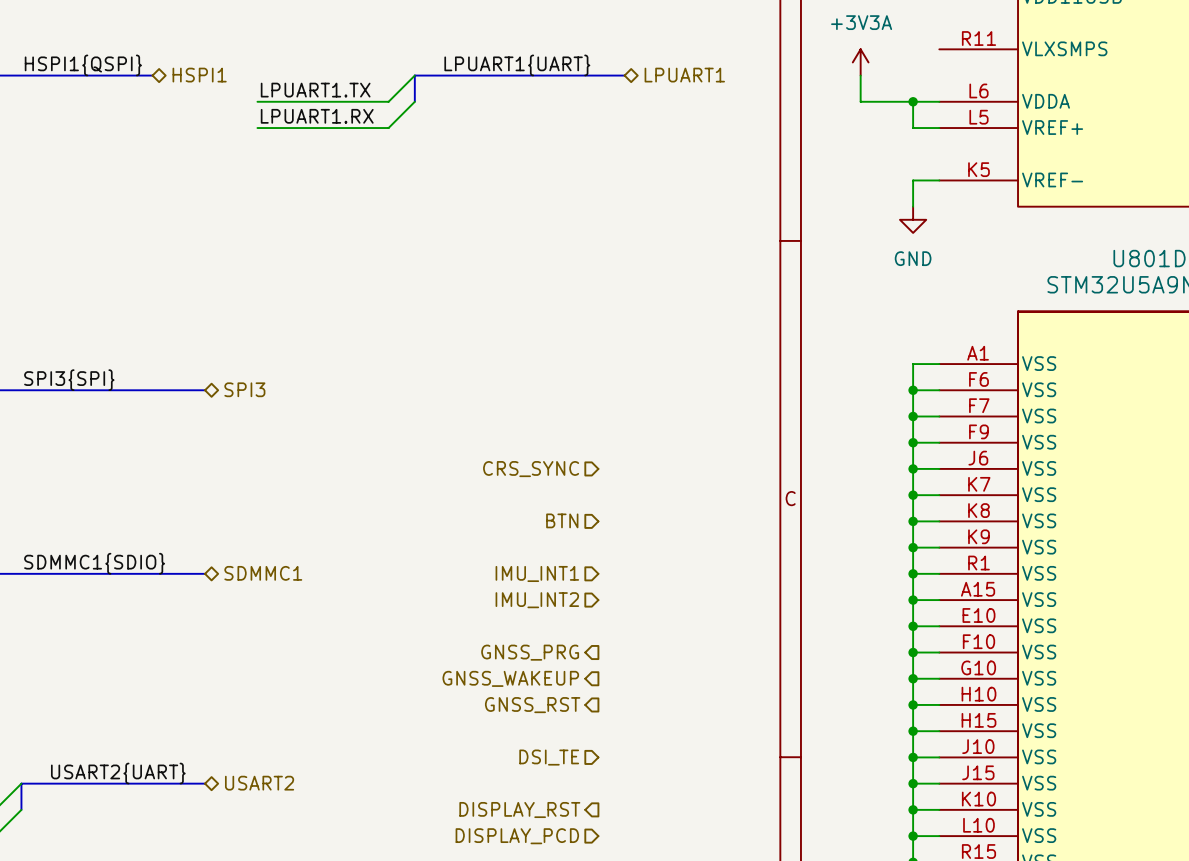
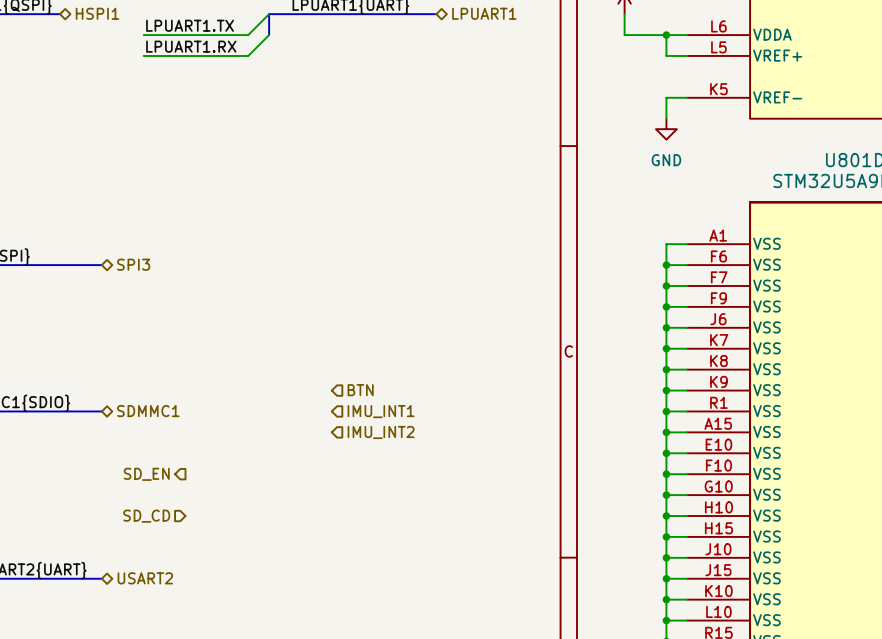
hierarchical label: CRS_SYNC (531, 469) -> none
hierarchical label rotation: 0° (562, 520) -> 180° (360, 390)
hierarchical label rotation: 0° (537, 573) -> 180° (381, 411)
hierarchical label rotation: 0° (537, 600) -> 180° (381, 432)
hierarchical label: none -> SD_EN (146, 474)
hierarchical label: GNSS_PRG (530, 652) -> none
hierarchical label: GNSS_WAKEUP (510, 678) -> none
hierarchical label: none -> SD_CD (146, 516)
hierarchical label: GNSS_RST (532, 705) -> none
hierarchical label: DSI_TE (549, 757) -> none
hierarchical label: DISPLAY_RST (519, 810) -> none
hierarchical label: DISPLAY_PCD (517, 836) -> none

